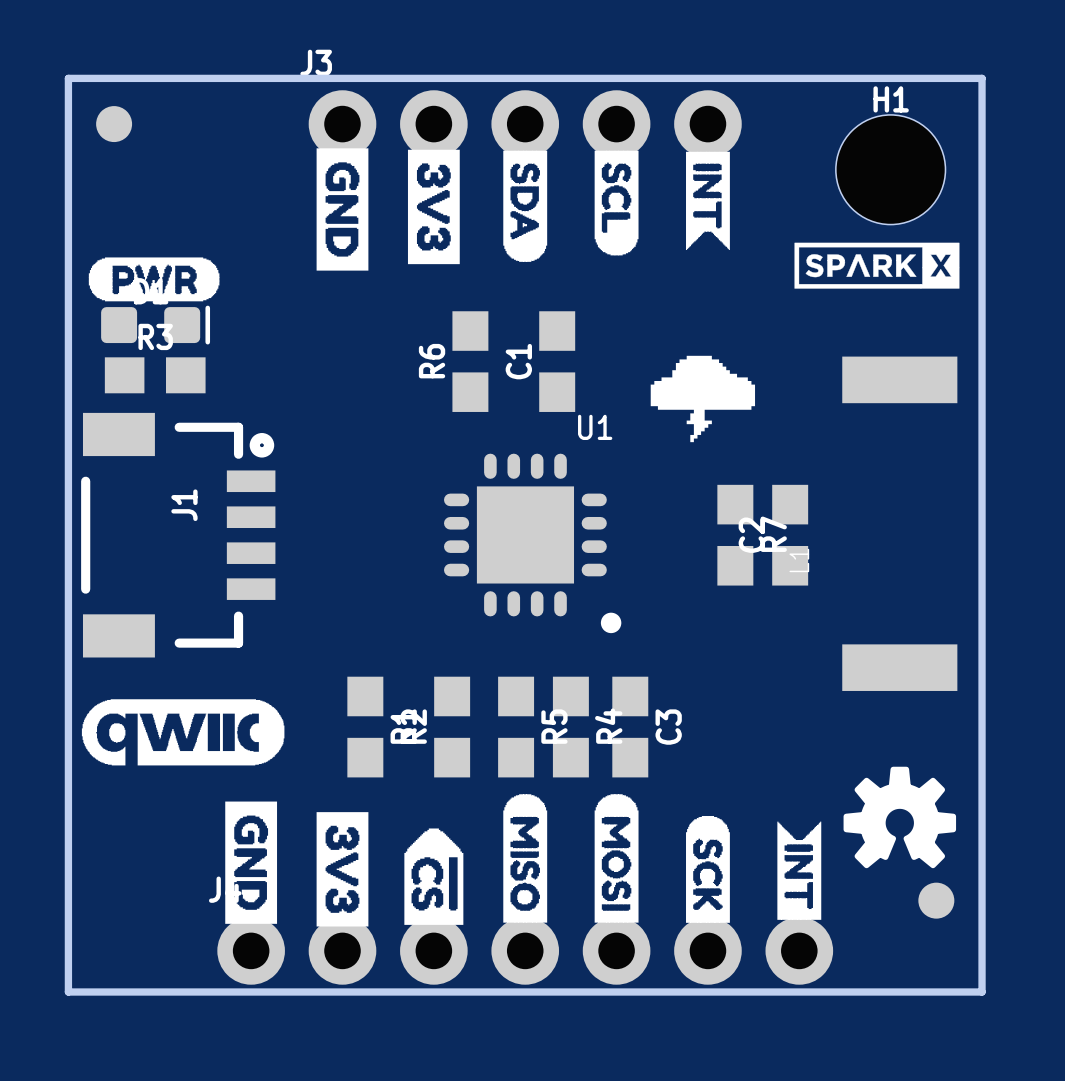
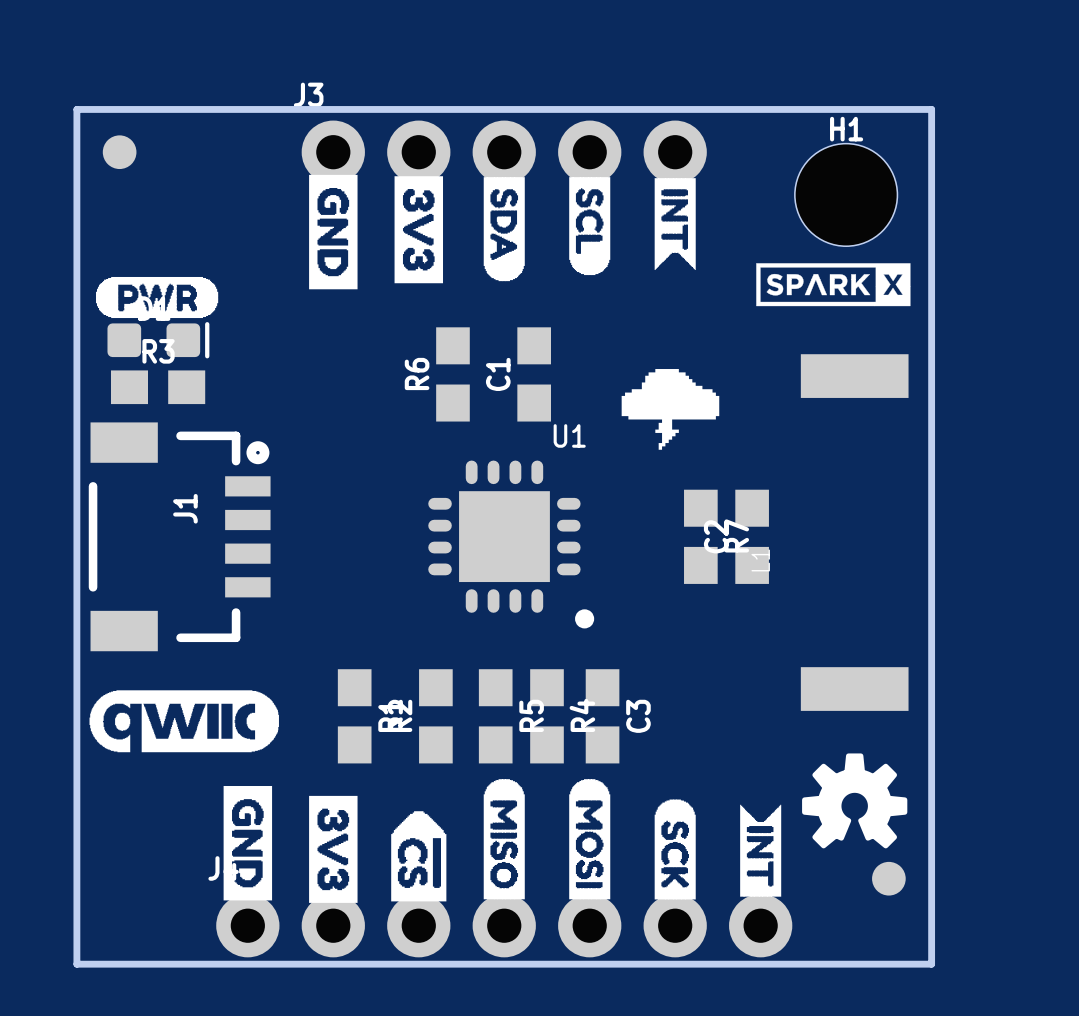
part footprint: [842, 356, 958, 691] -> [800, 354, 909, 711]

